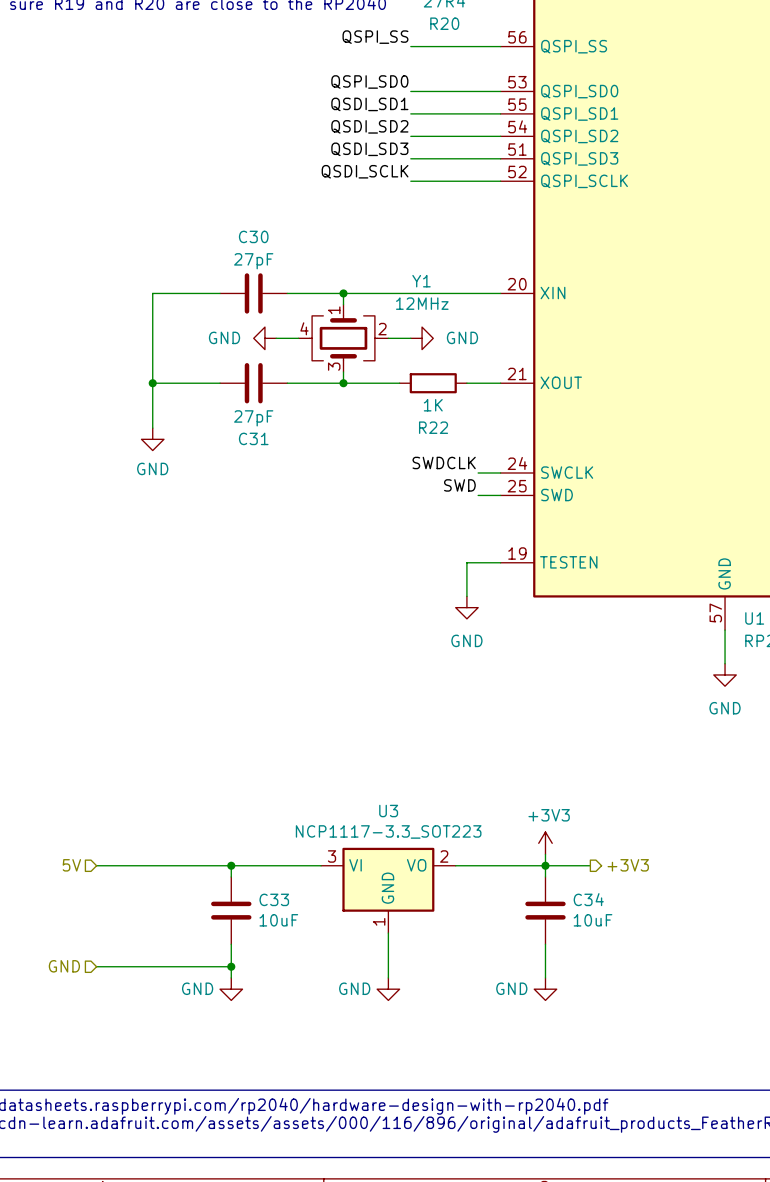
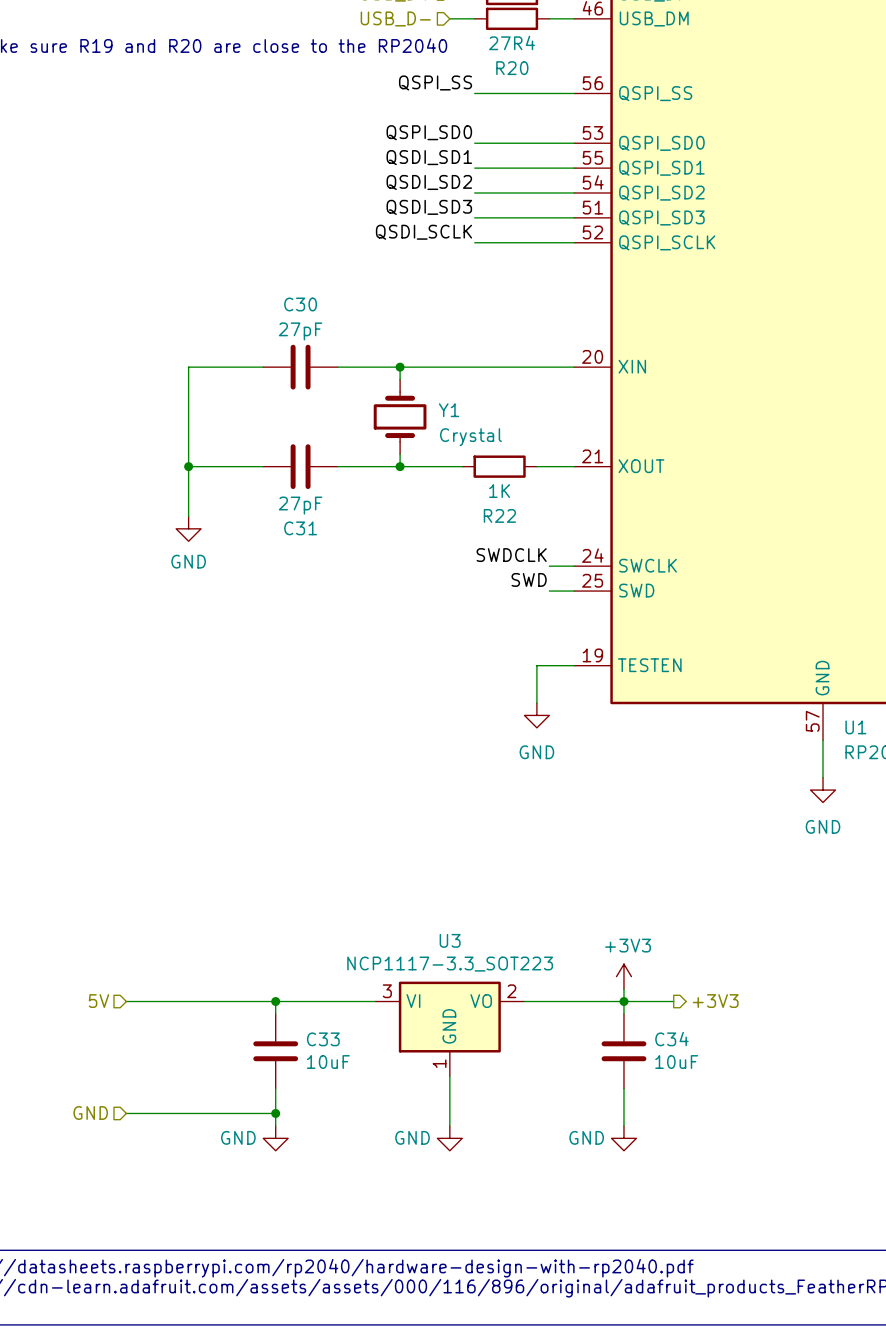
Y1 name position: Y1 (421, 281) -> Y1 (449, 410)
Y1 value: 12MHz (422, 303) -> Crystal (470, 437)
Y1 symbol: [298, 304, 389, 373] -> [373, 379, 427, 455]
power symbol: GND (264, 338) -> none
wire: (276, 338) (298, 338) -> none
wire: (388, 338) (410, 338) -> none
power symbol: GND (422, 338) -> none

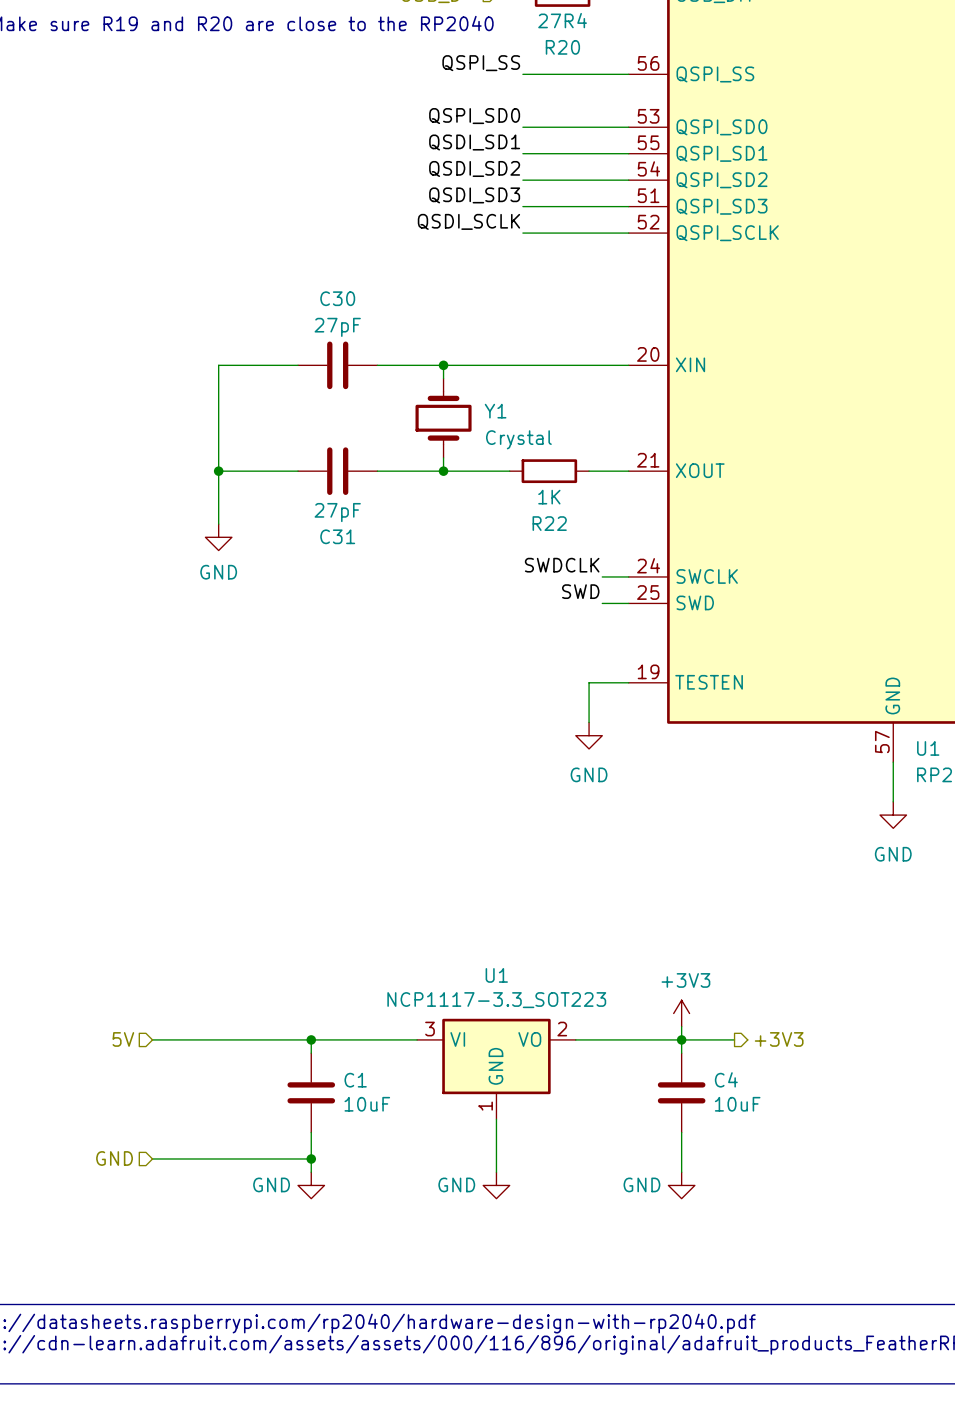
U3 name: U3 (450, 940) -> U1 (496, 975)
C33 name: C33 (323, 1039) -> C1 (355, 1080)
C34 name: C34 (671, 1039) -> C4 (726, 1079)

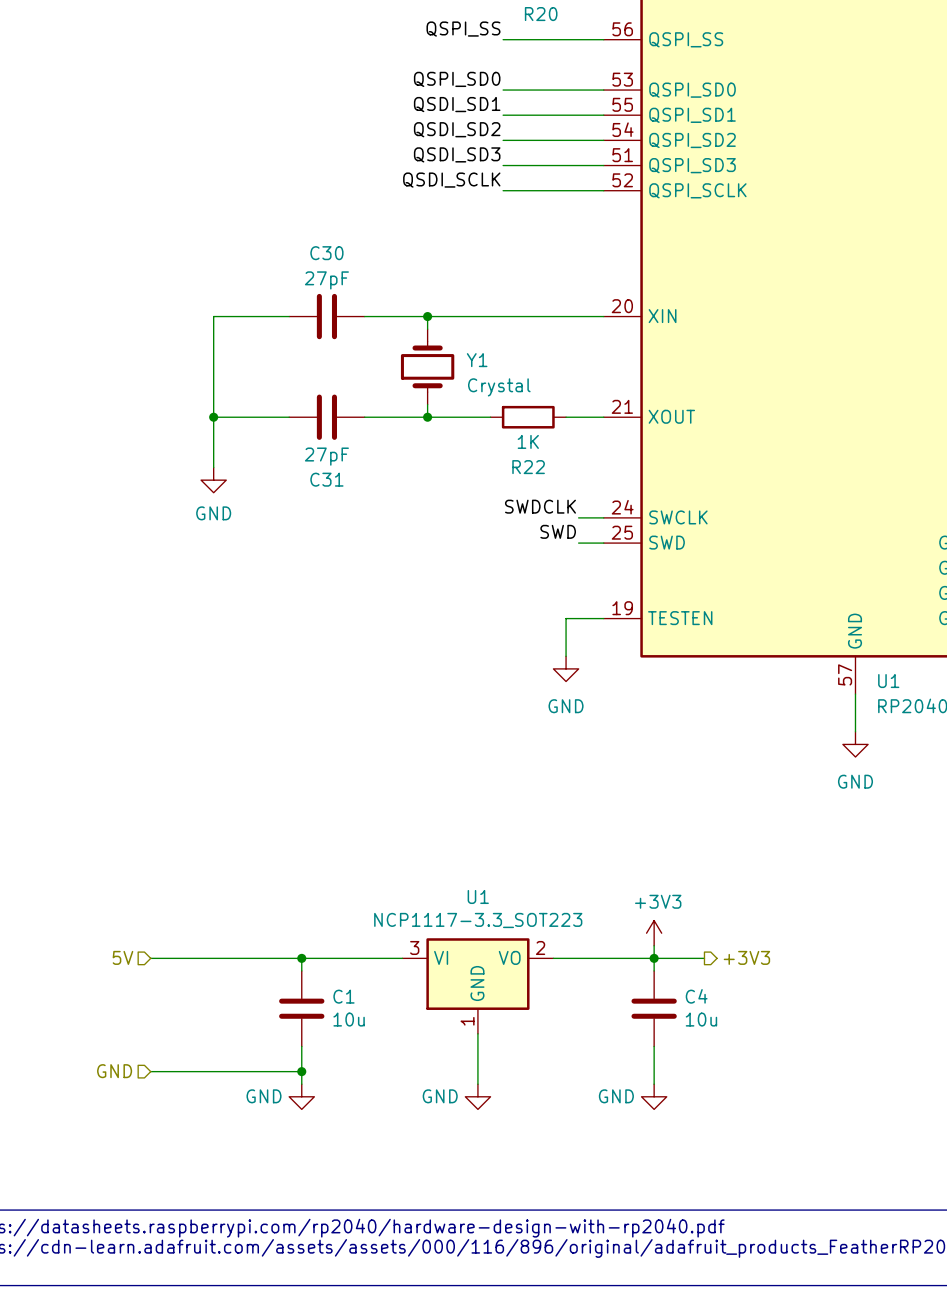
C1 value: 10uF (367, 1104) -> 10u (349, 1019)
C4 value: 10uF (737, 1104) -> 10u (701, 1019)

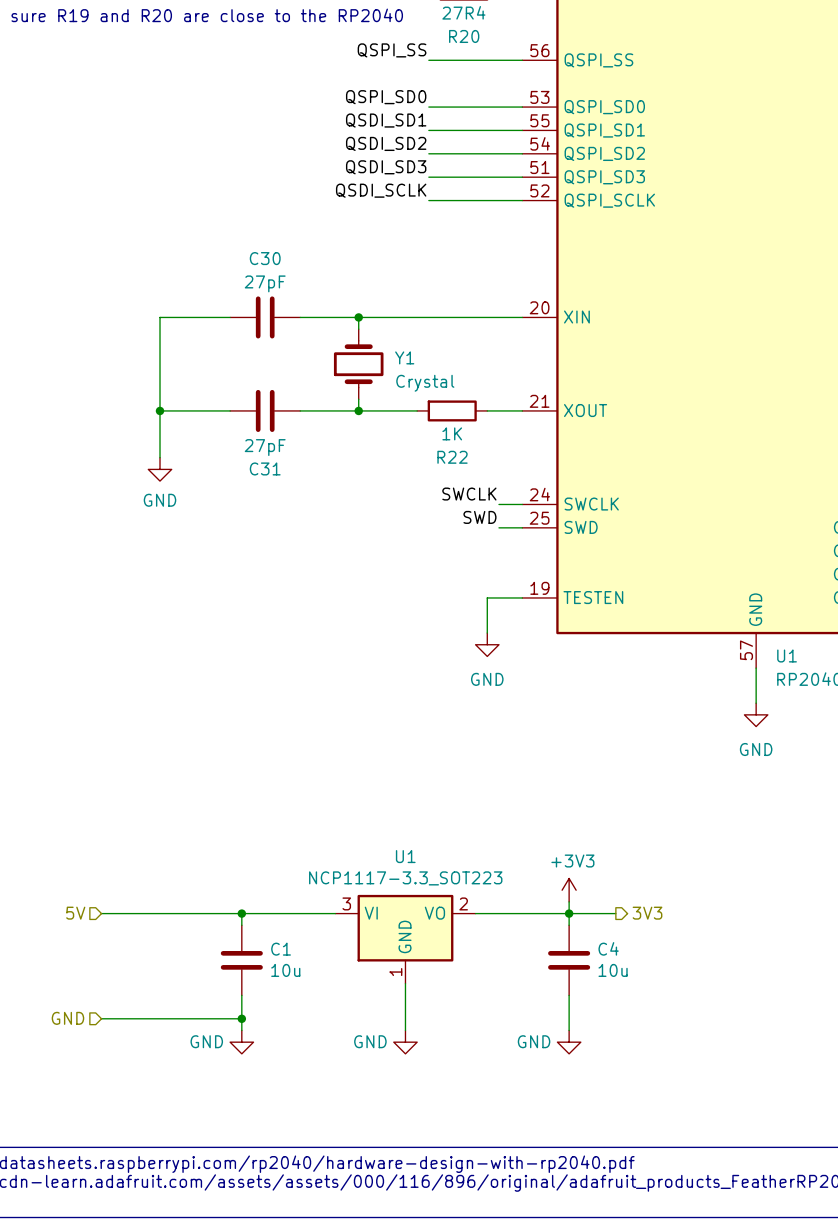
label: SWDCLK (540, 506) -> SWCLK (469, 494)
hierarchical label: +3V3 (746, 957) -> 3V3 (647, 913)

